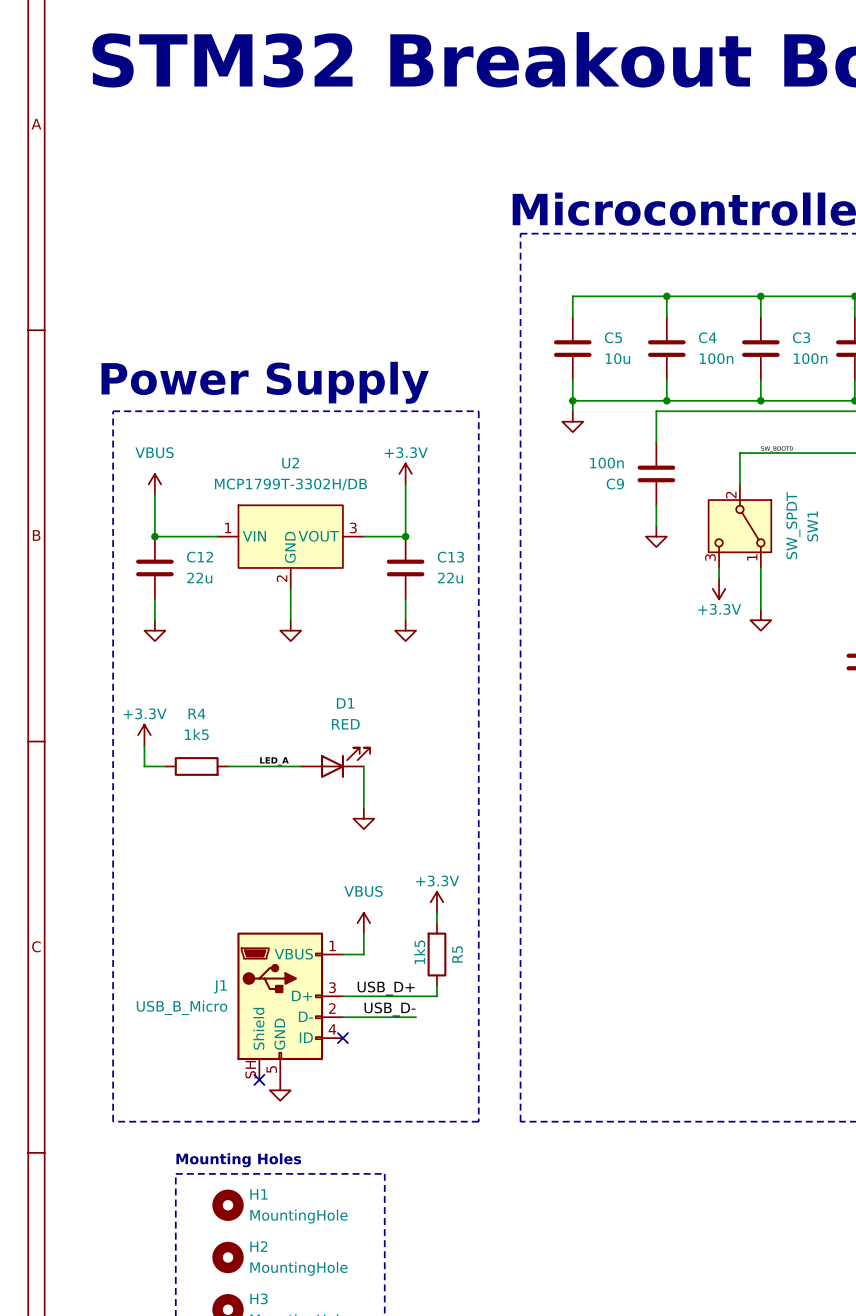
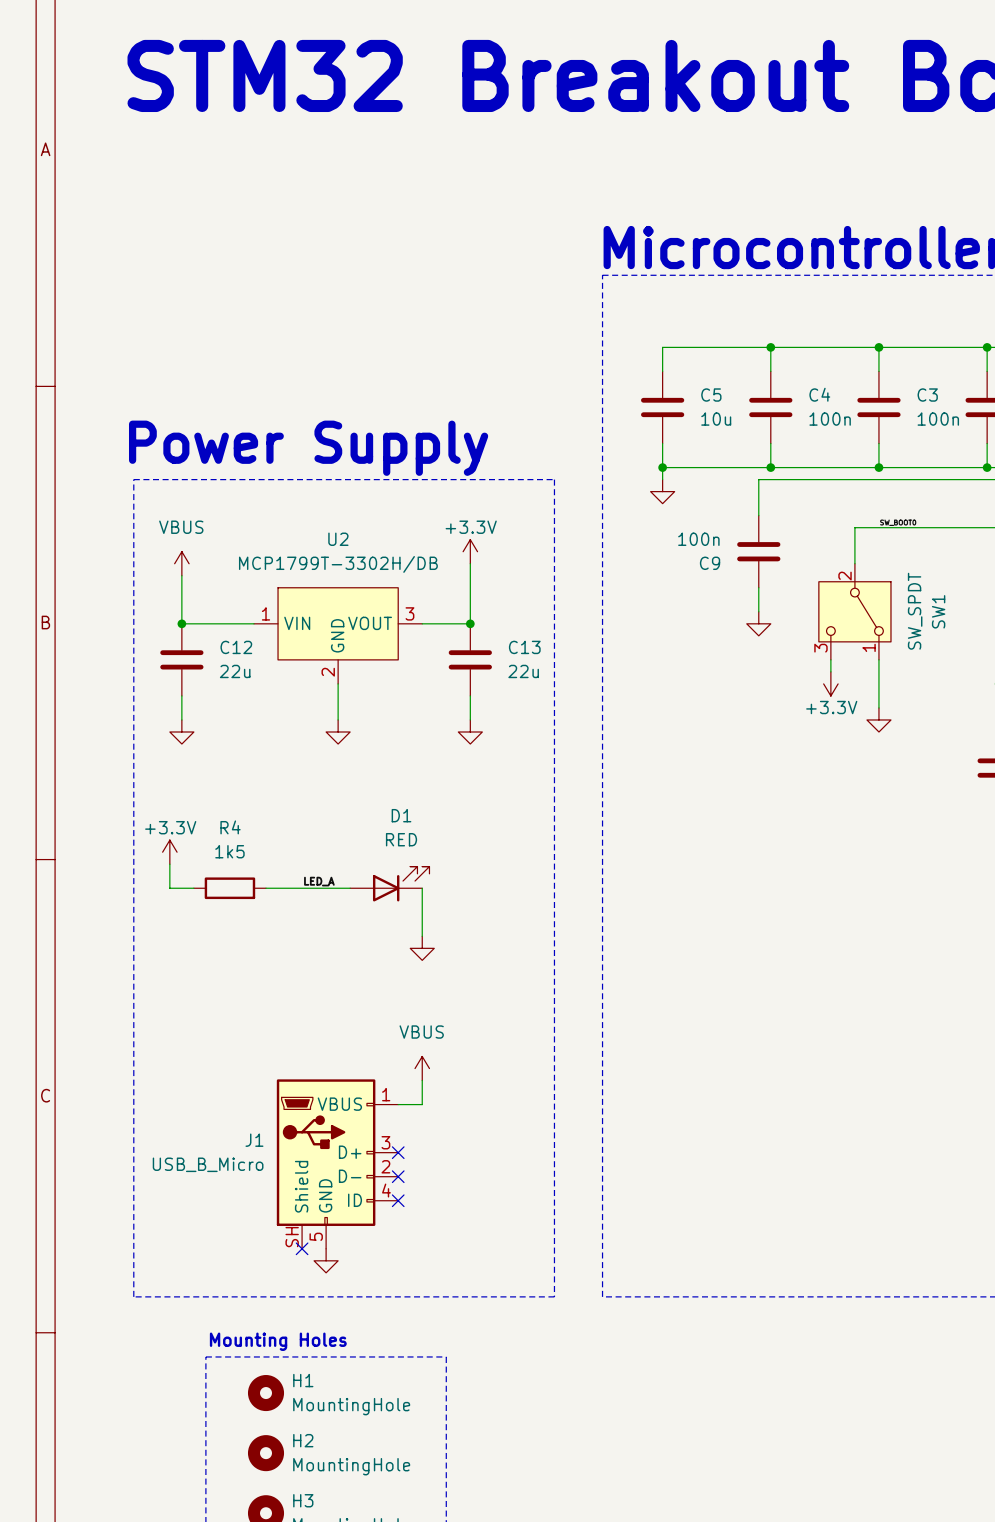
power symbol: +3.3V (436, 902) -> none
wire: (436, 912) (436, 923) -> none
R5: 1k5 (436, 954) -> none
wire: (436, 985) (436, 996) (342, 996) -> none
label: USB_D+ (386, 988) -> none
no-connect mark: none -> (398, 1152)
label: USB_D- (389, 1009) -> none
wire: (342, 1017) (416, 1017) -> none
no-connect mark: none -> (398, 1176)

